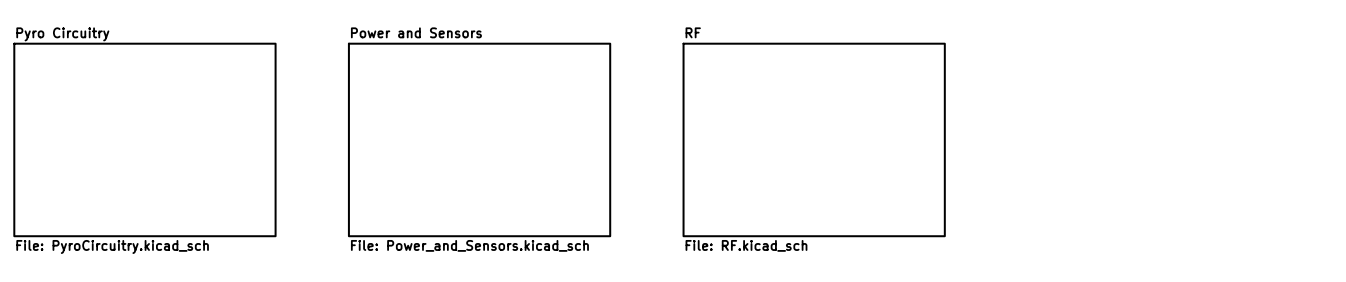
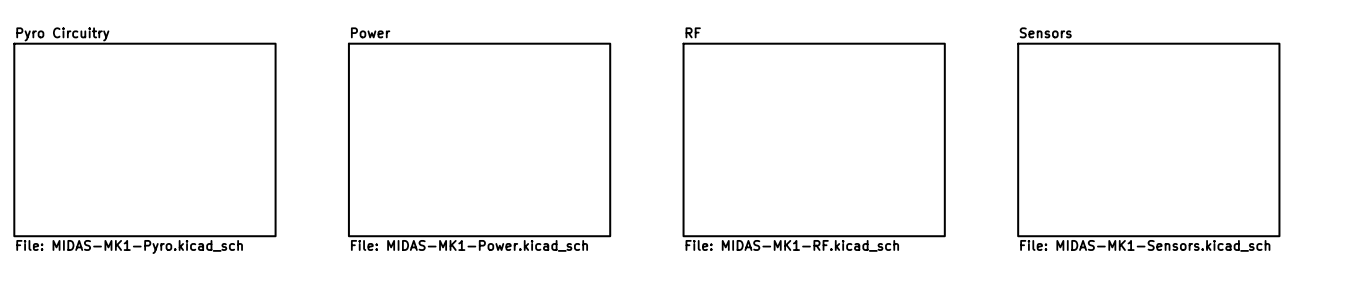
sheet Power and Sensors name: Power and Sensors (416, 32) -> Power (370, 32)
sheet Sensors: none -> File: MIDAS-MK1-Sensors.kicad_sch (1148, 139)
sheet Power and Sensors value: File: Power_and_Sensors.kicad_sch (469, 245) -> File: MIDAS-MK1-Power.kicad_sch (469, 245)
sheet RF value: File: RF.kicad_sch (746, 245) -> File: MIDAS-MK1-RF.kicad_sch (792, 245)
sheet Pyro Circuitry value: File: PyroCircuitry.kicad_sch (112, 246) -> File: MIDAS-MK1-Pyro.kicad_sch (129, 246)

